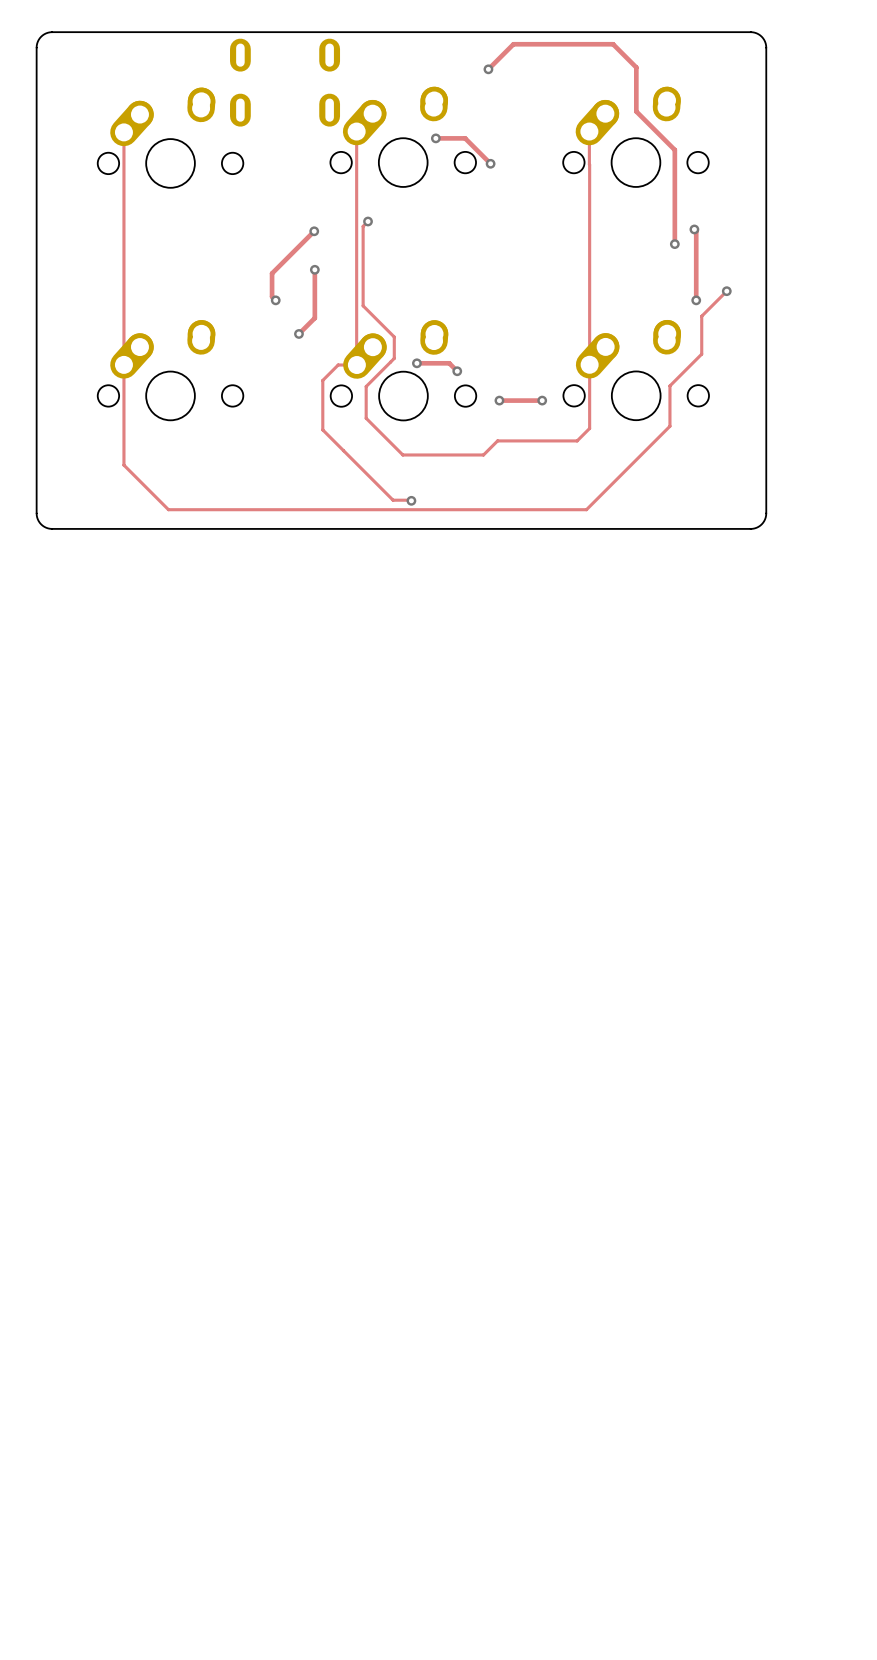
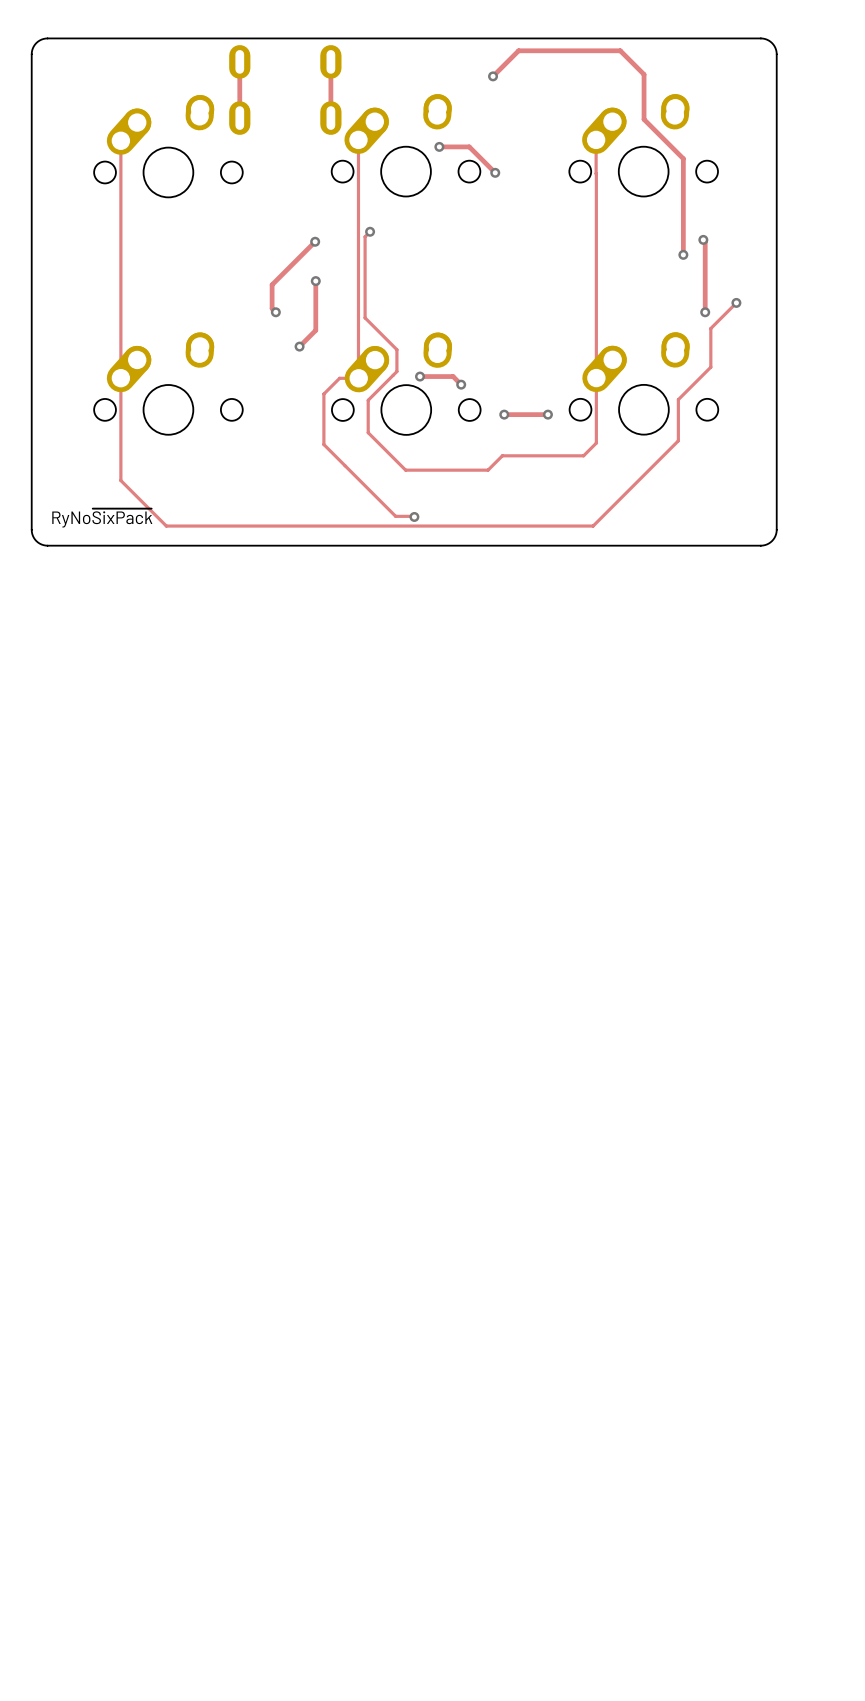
track: none -> (239, 61) (239, 118)
track: none -> (330, 61) (330, 118)
text: none -> RyNo~{SixPack} (102, 518)

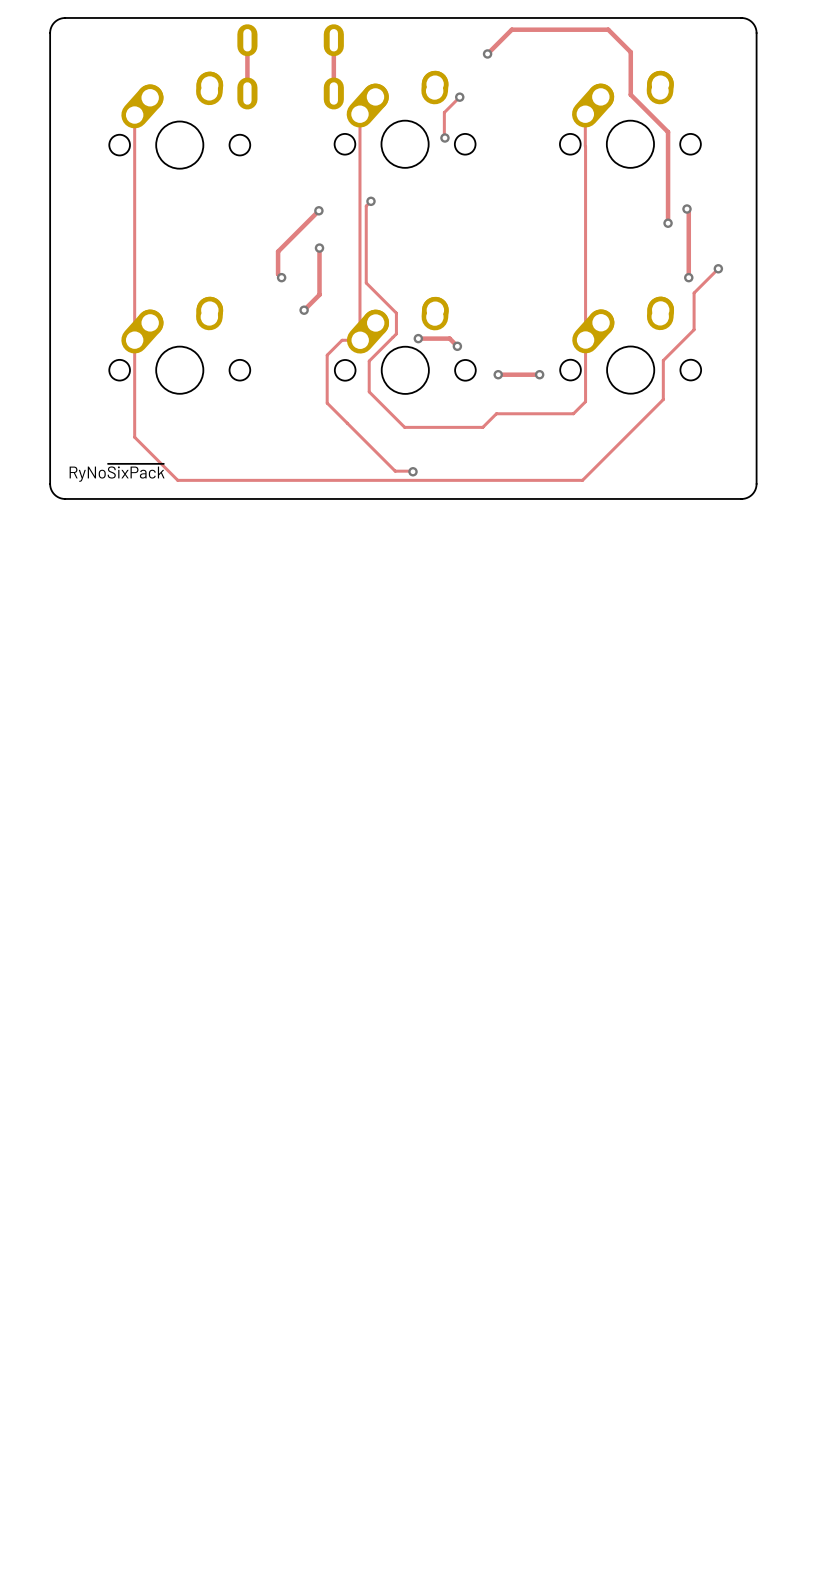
track: none -> (459, 97) (444, 112) (444, 138)
via: none -> (459, 97)
track: (439, 146) (469, 146) (495, 172) -> none
via: (439, 146) -> none
via: none -> (444, 138)
via: (495, 172) -> none

